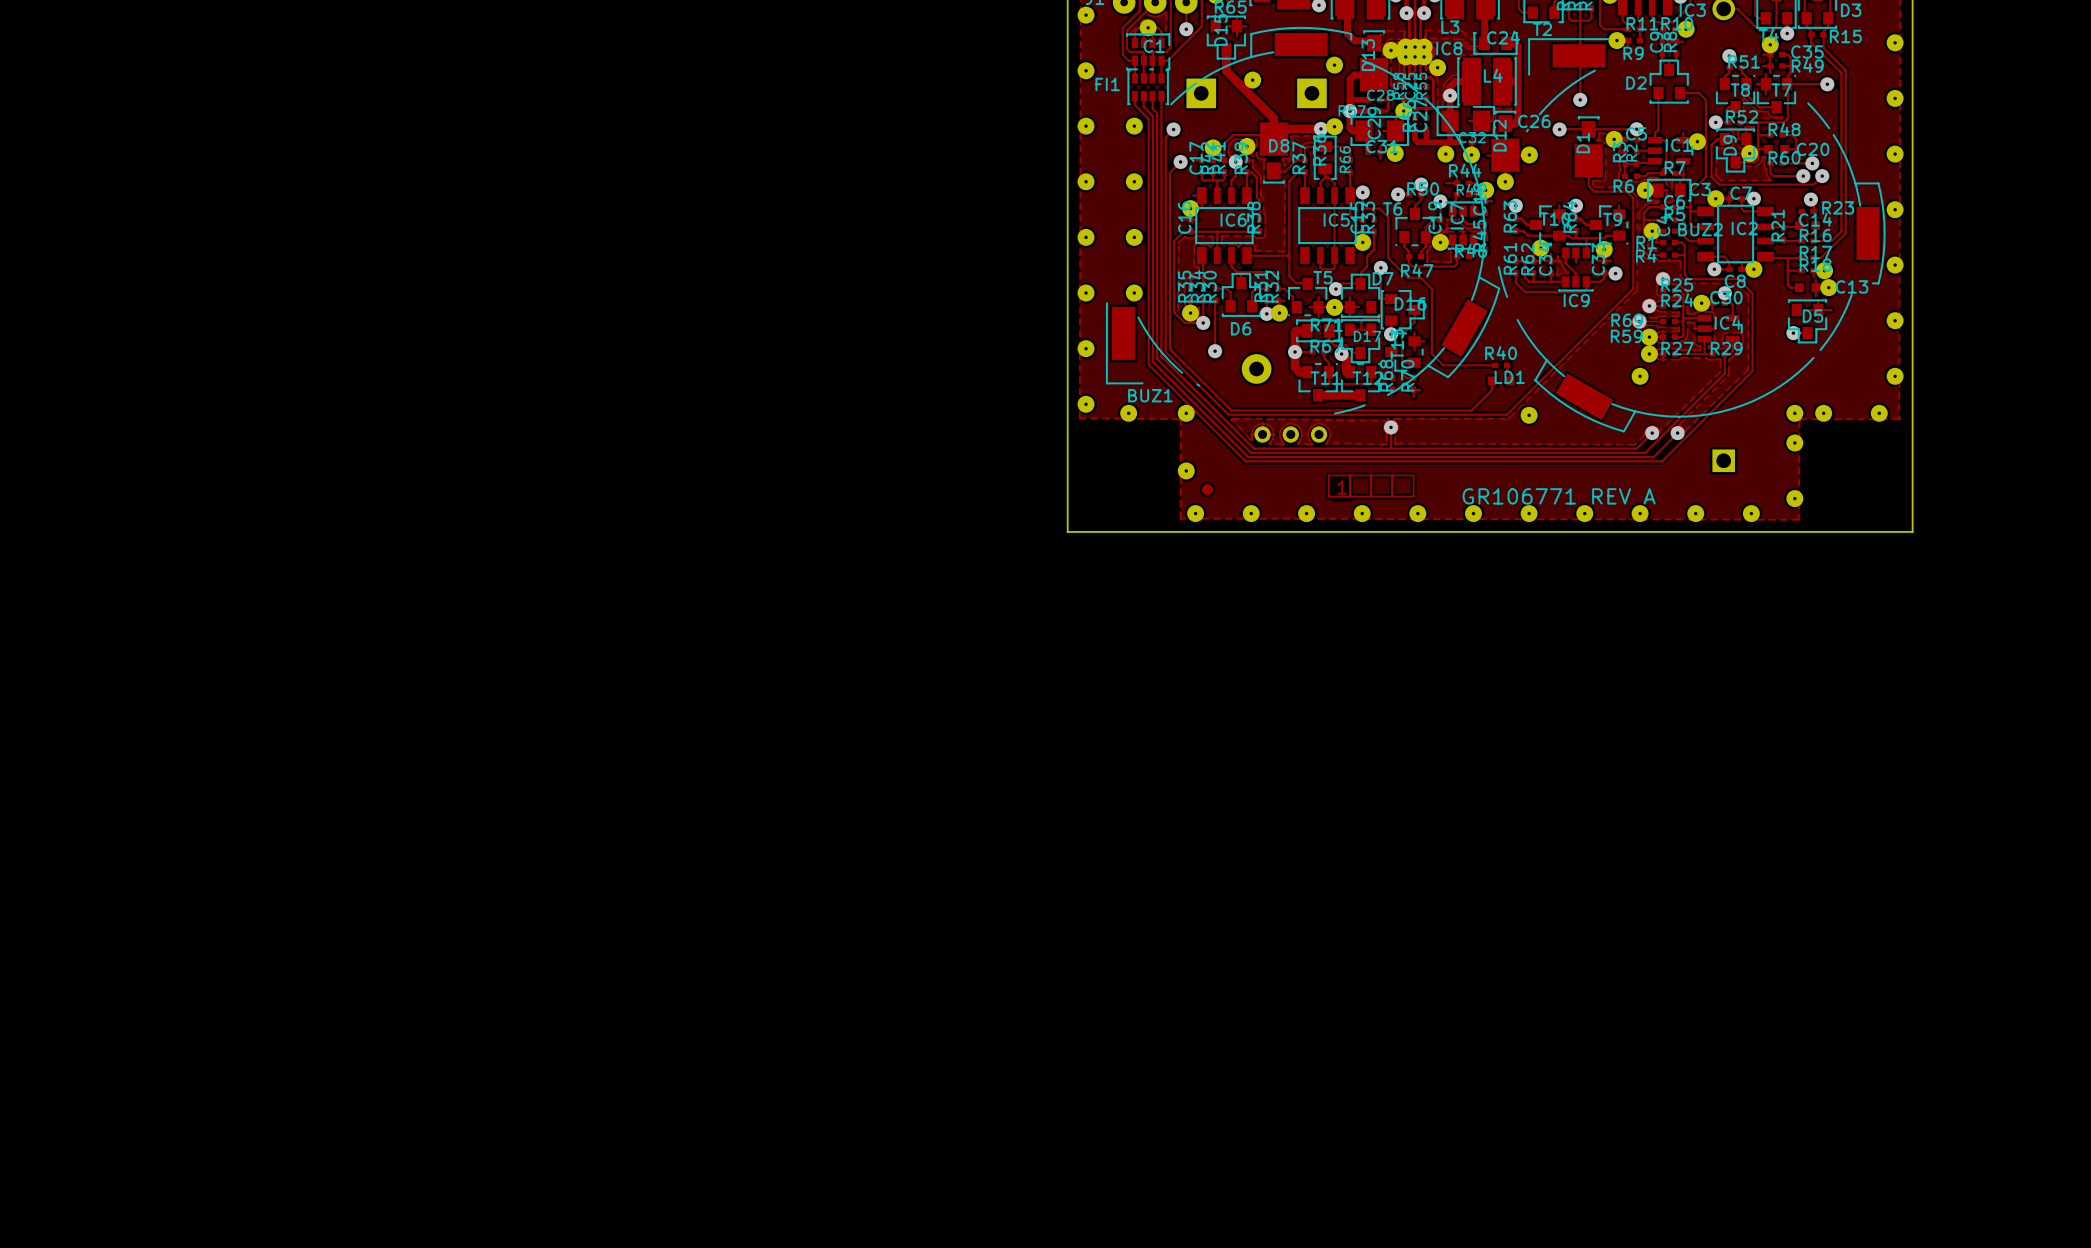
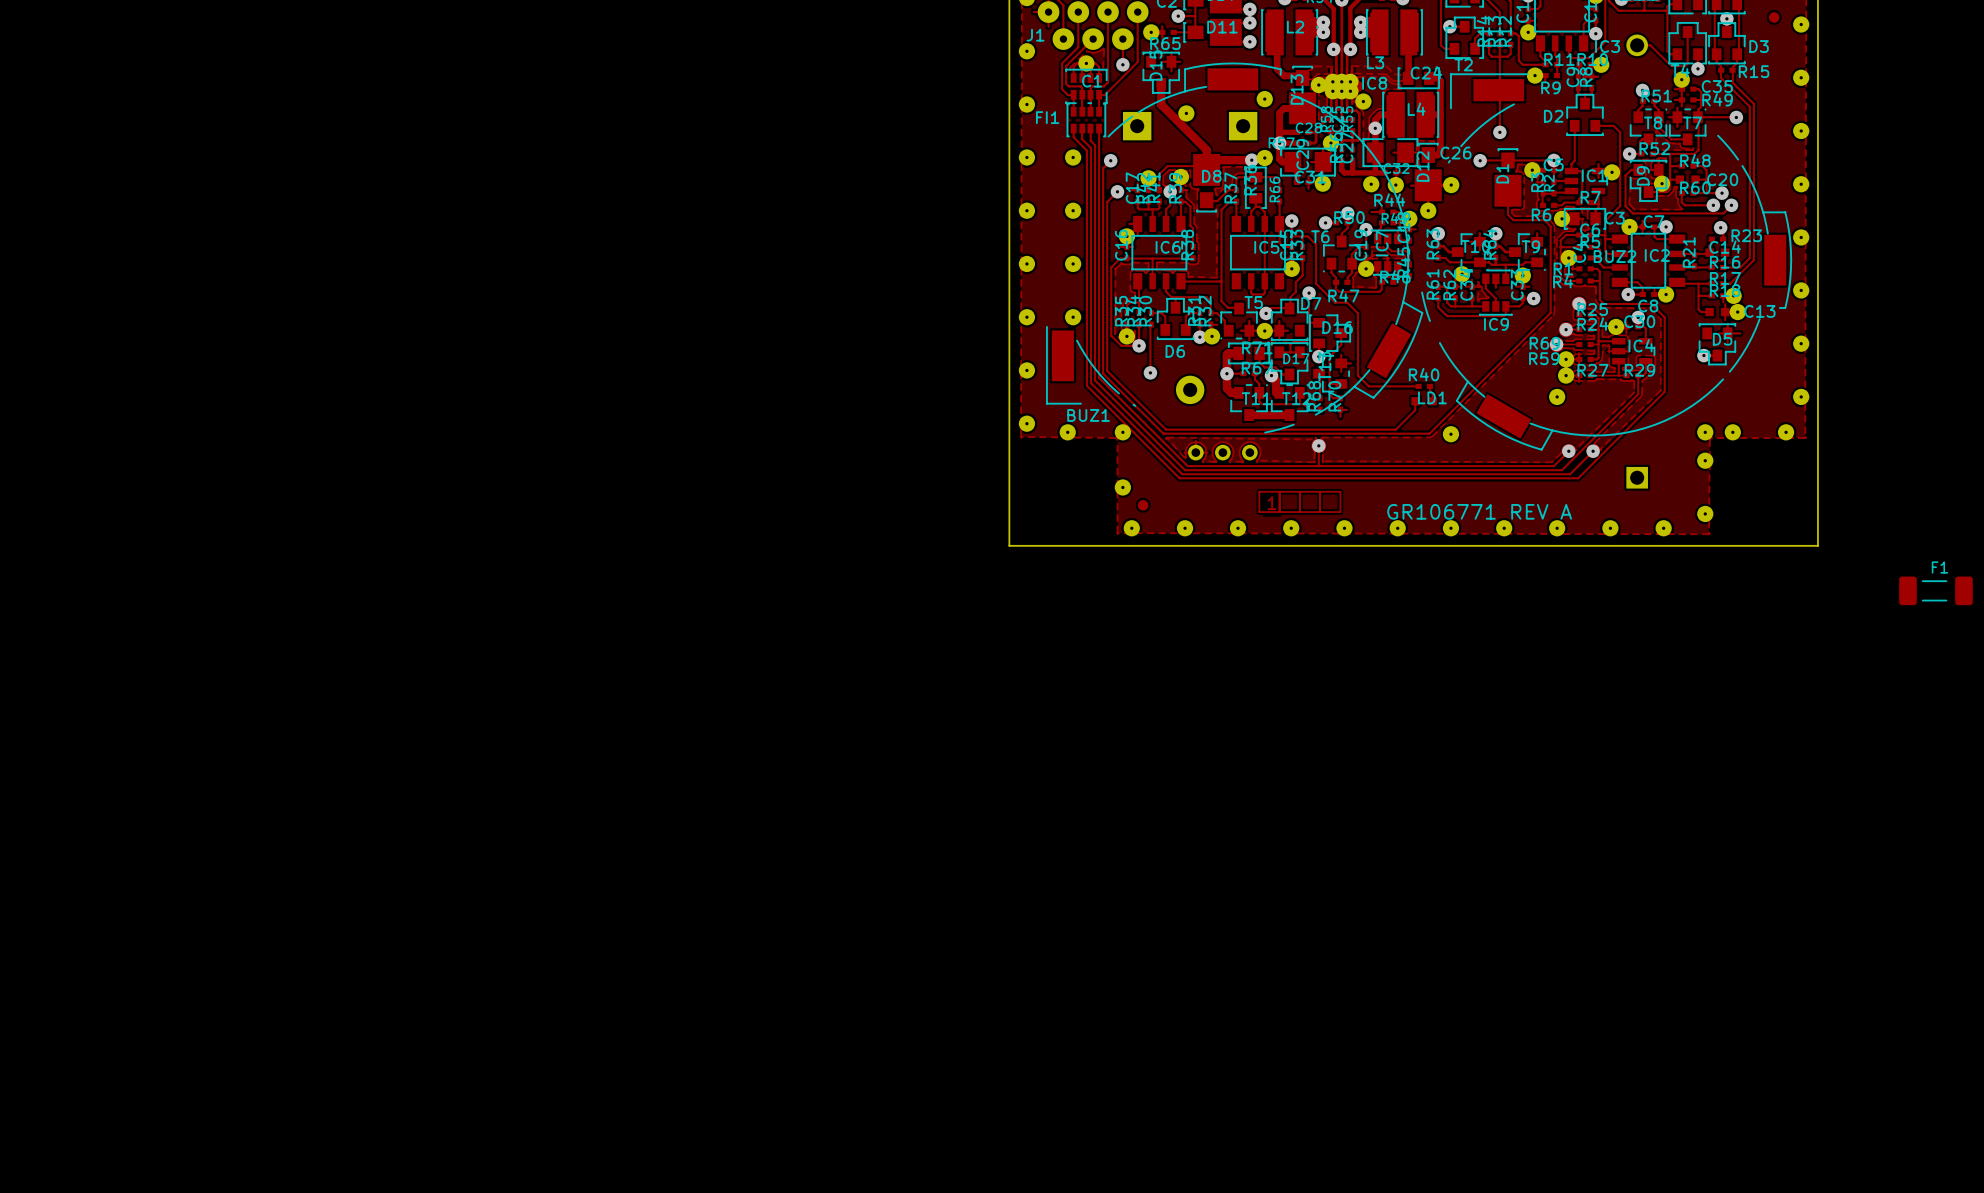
F1: none -> (1935, 590)

